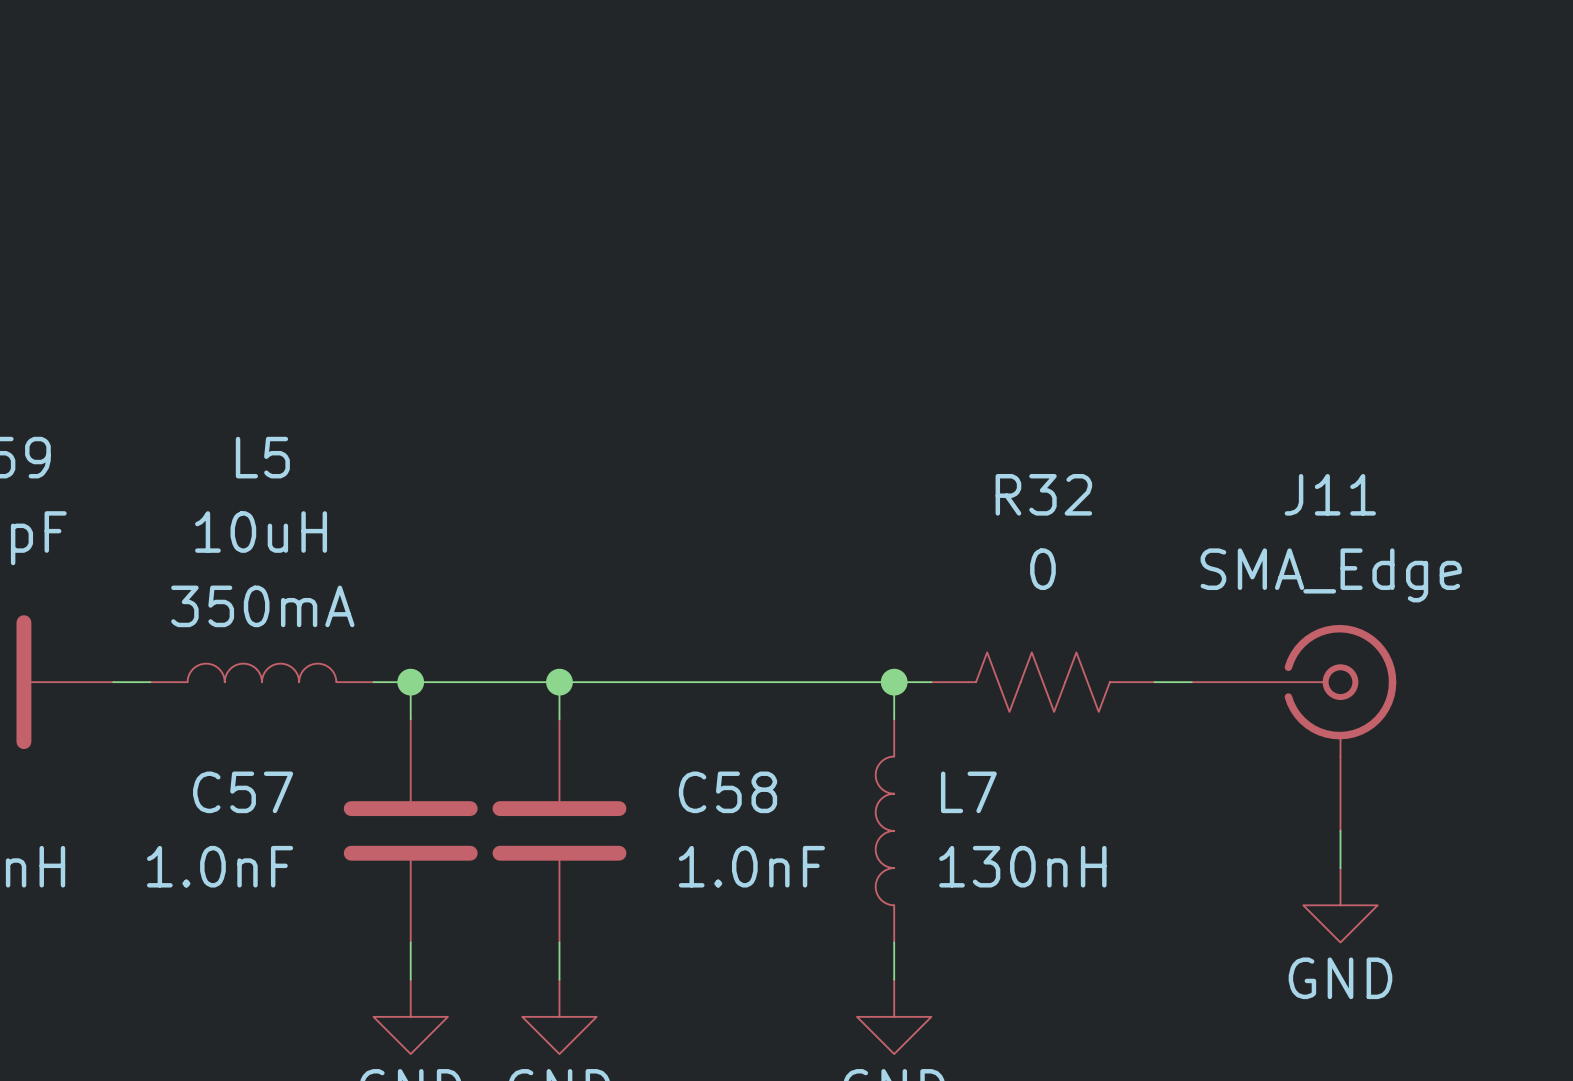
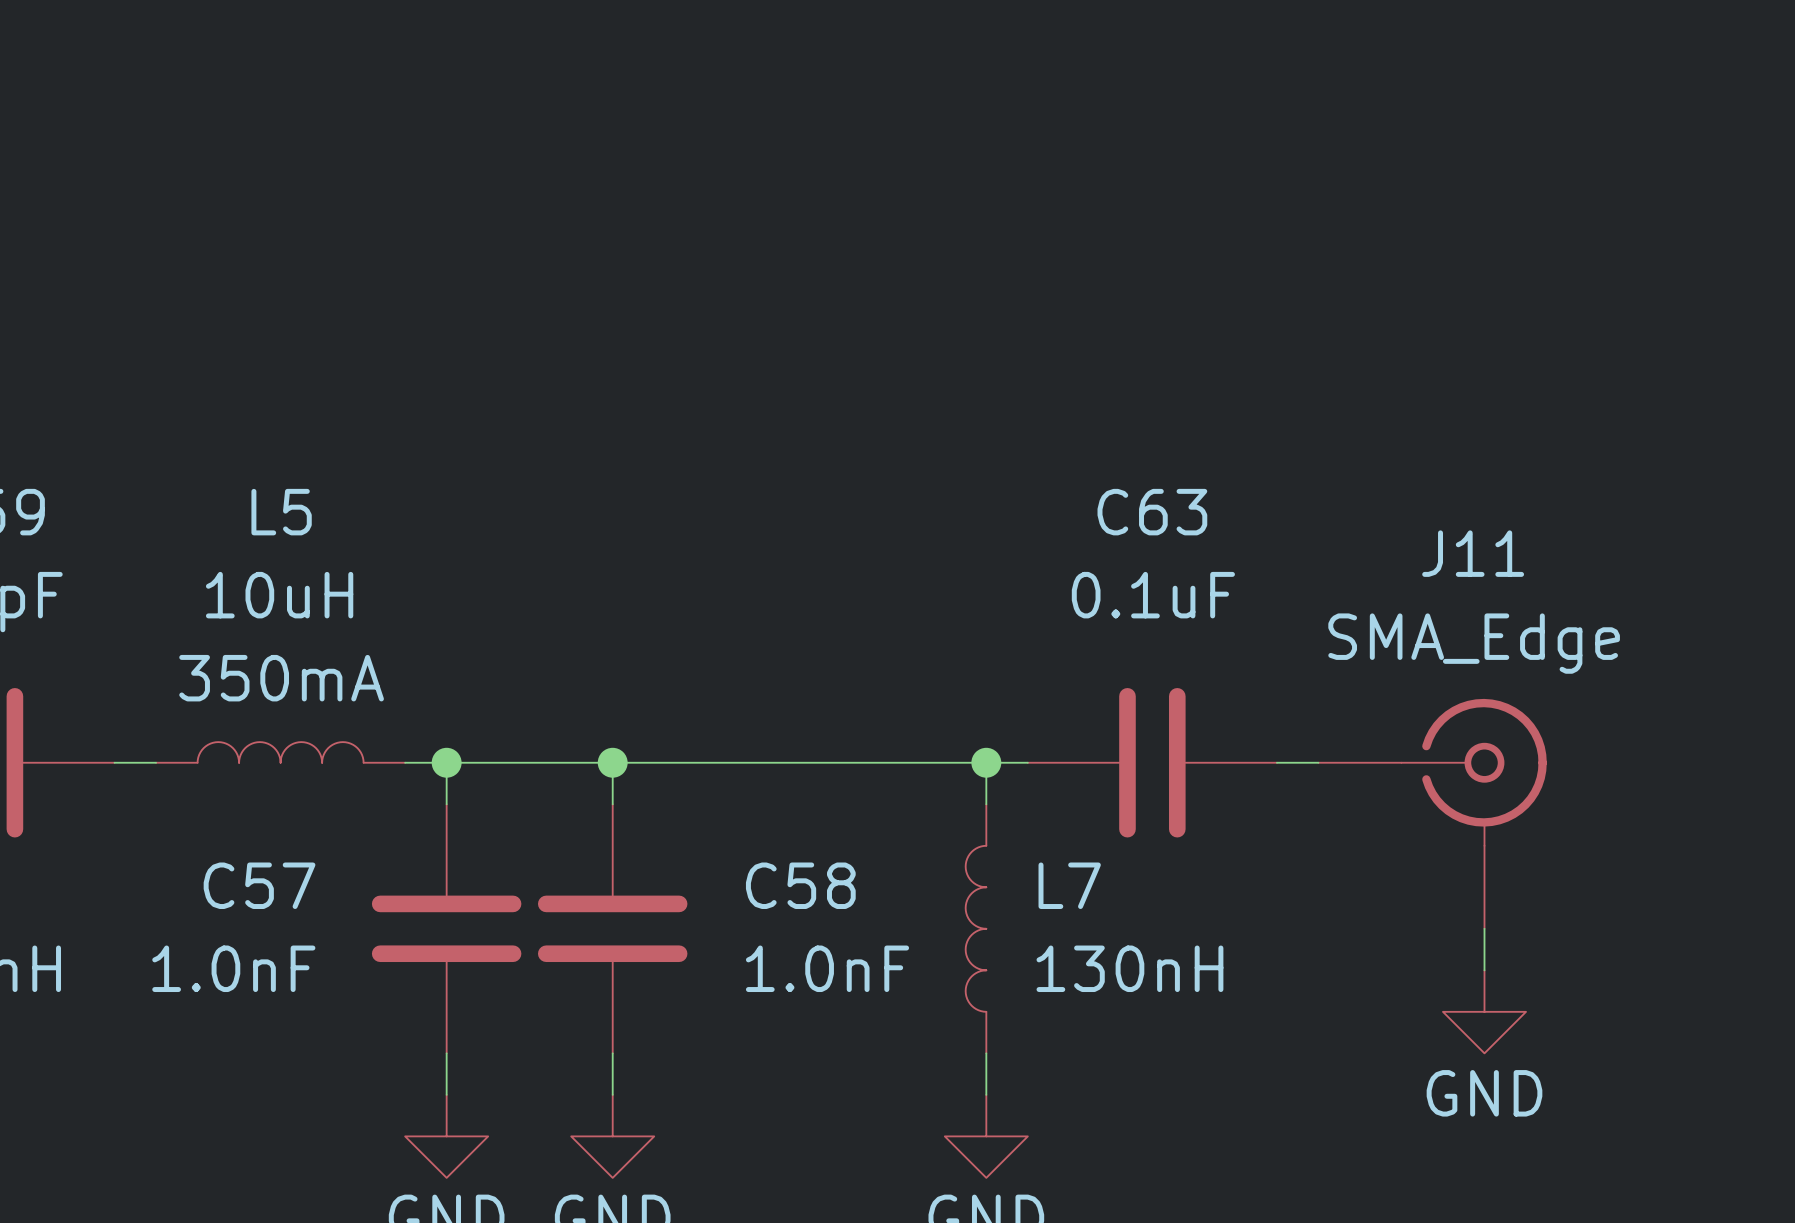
R32: 0 (1042, 682) -> none
C63: none -> 0.1uF (1152, 762)

